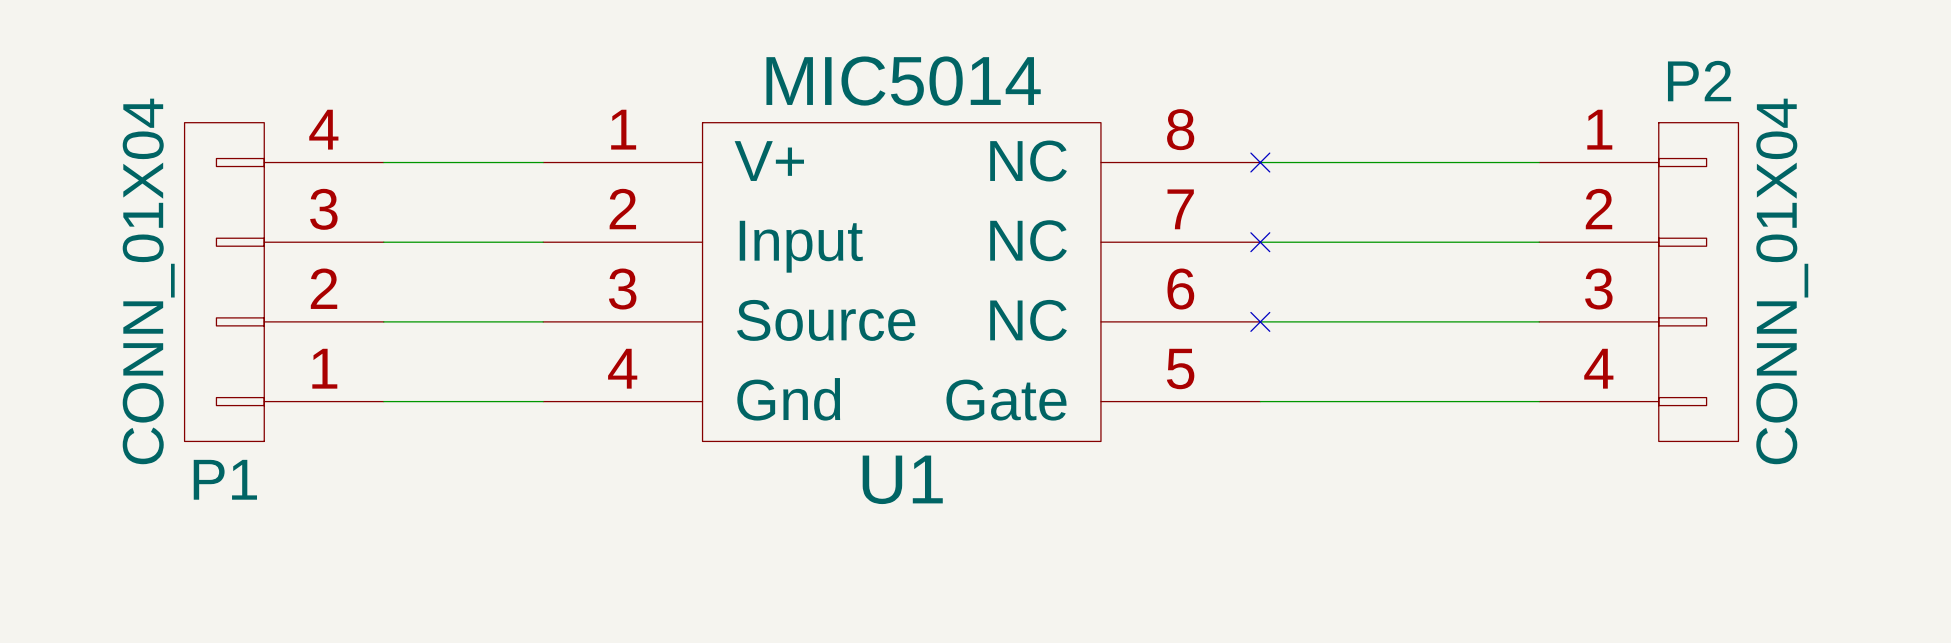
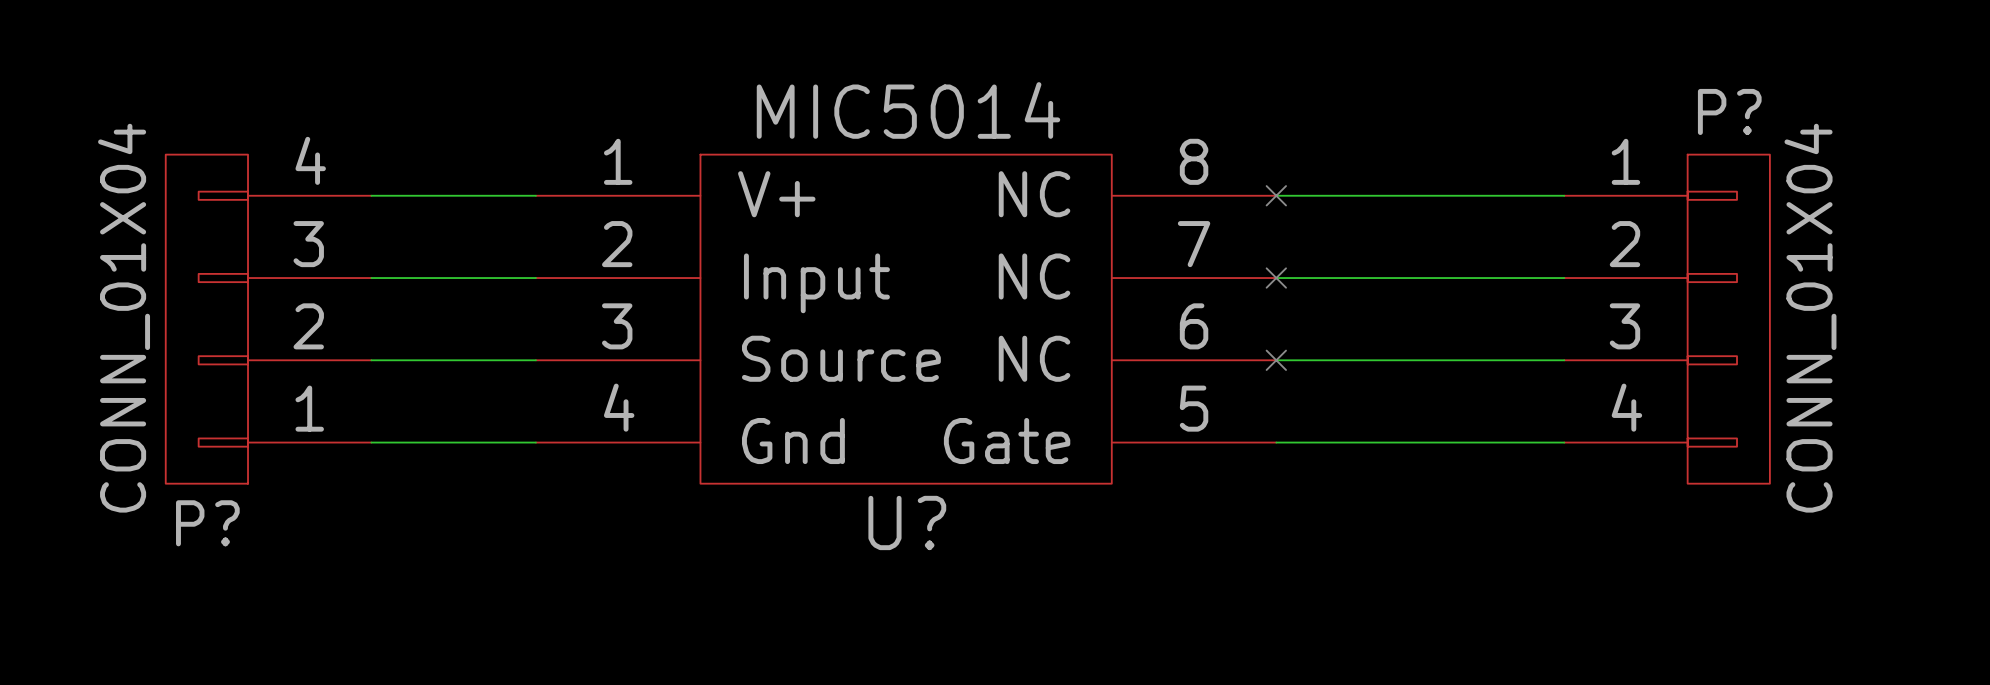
P2 name: P2 (1699, 81) -> P? (1729, 111)
P1 name: P1 (225, 479) -> P? (207, 523)
U1 name: U1 (902, 479) -> U? (907, 522)

